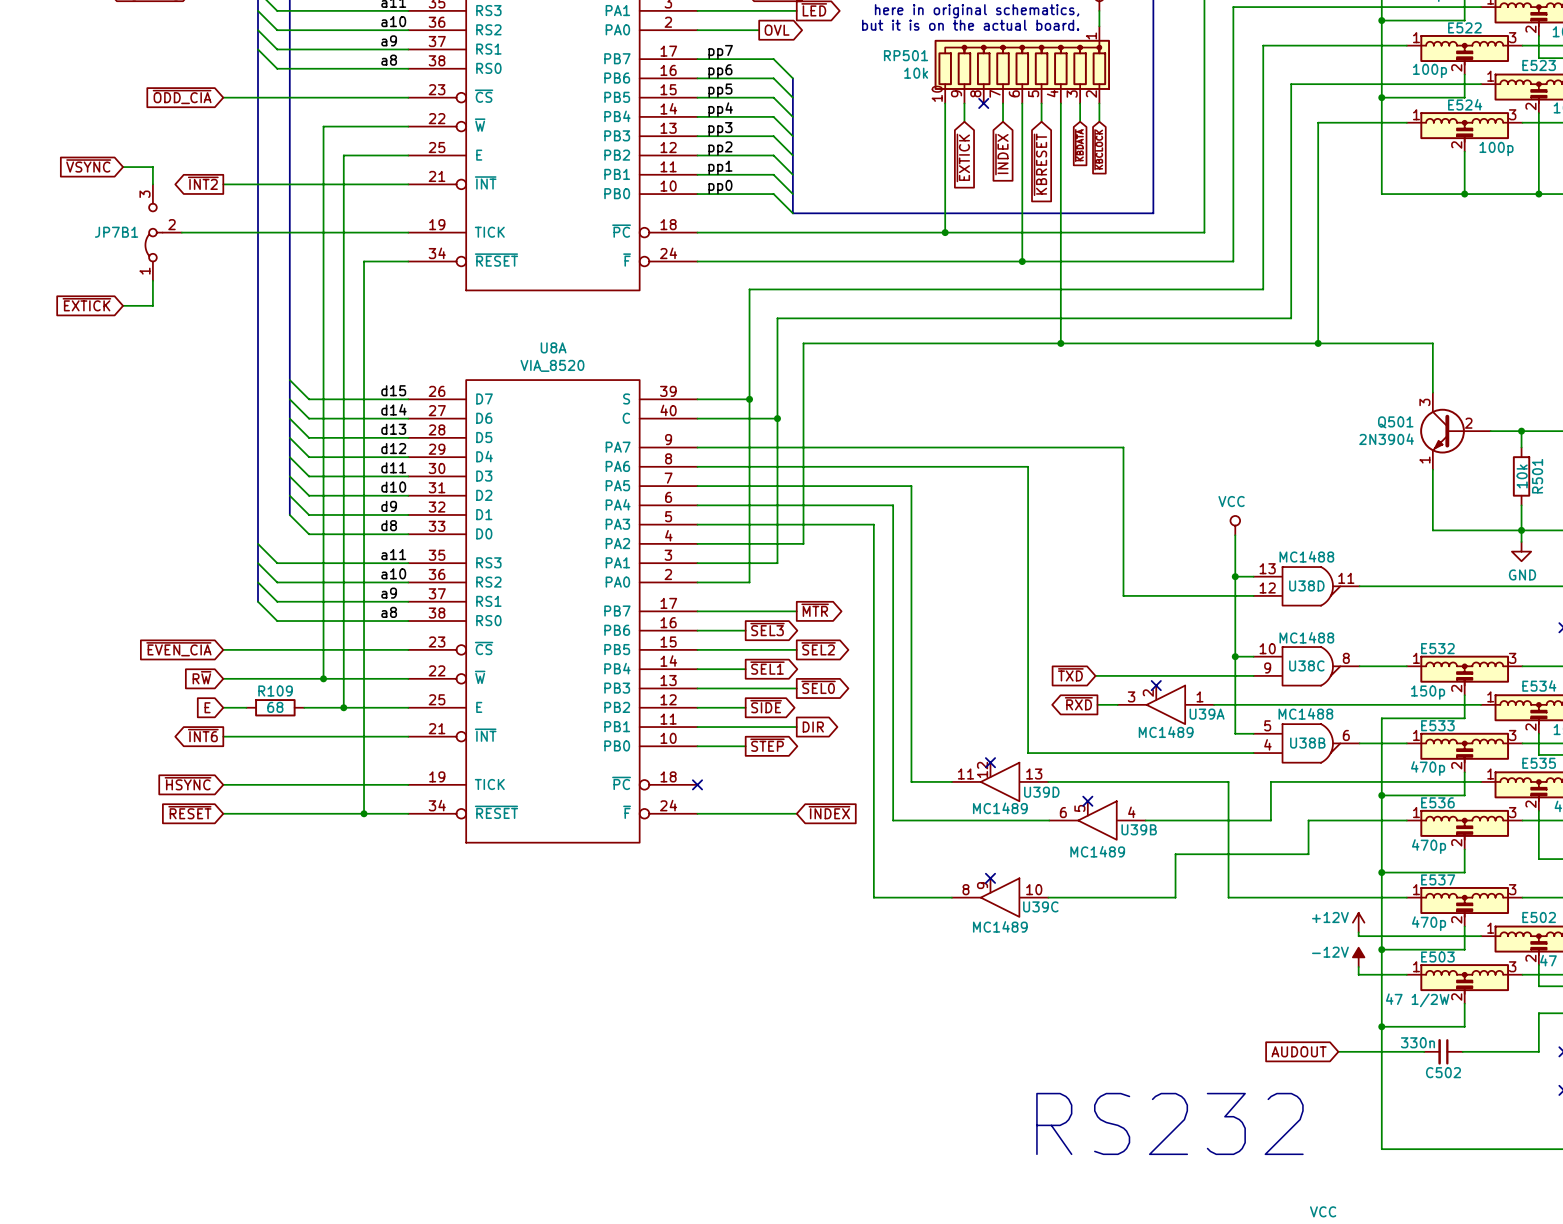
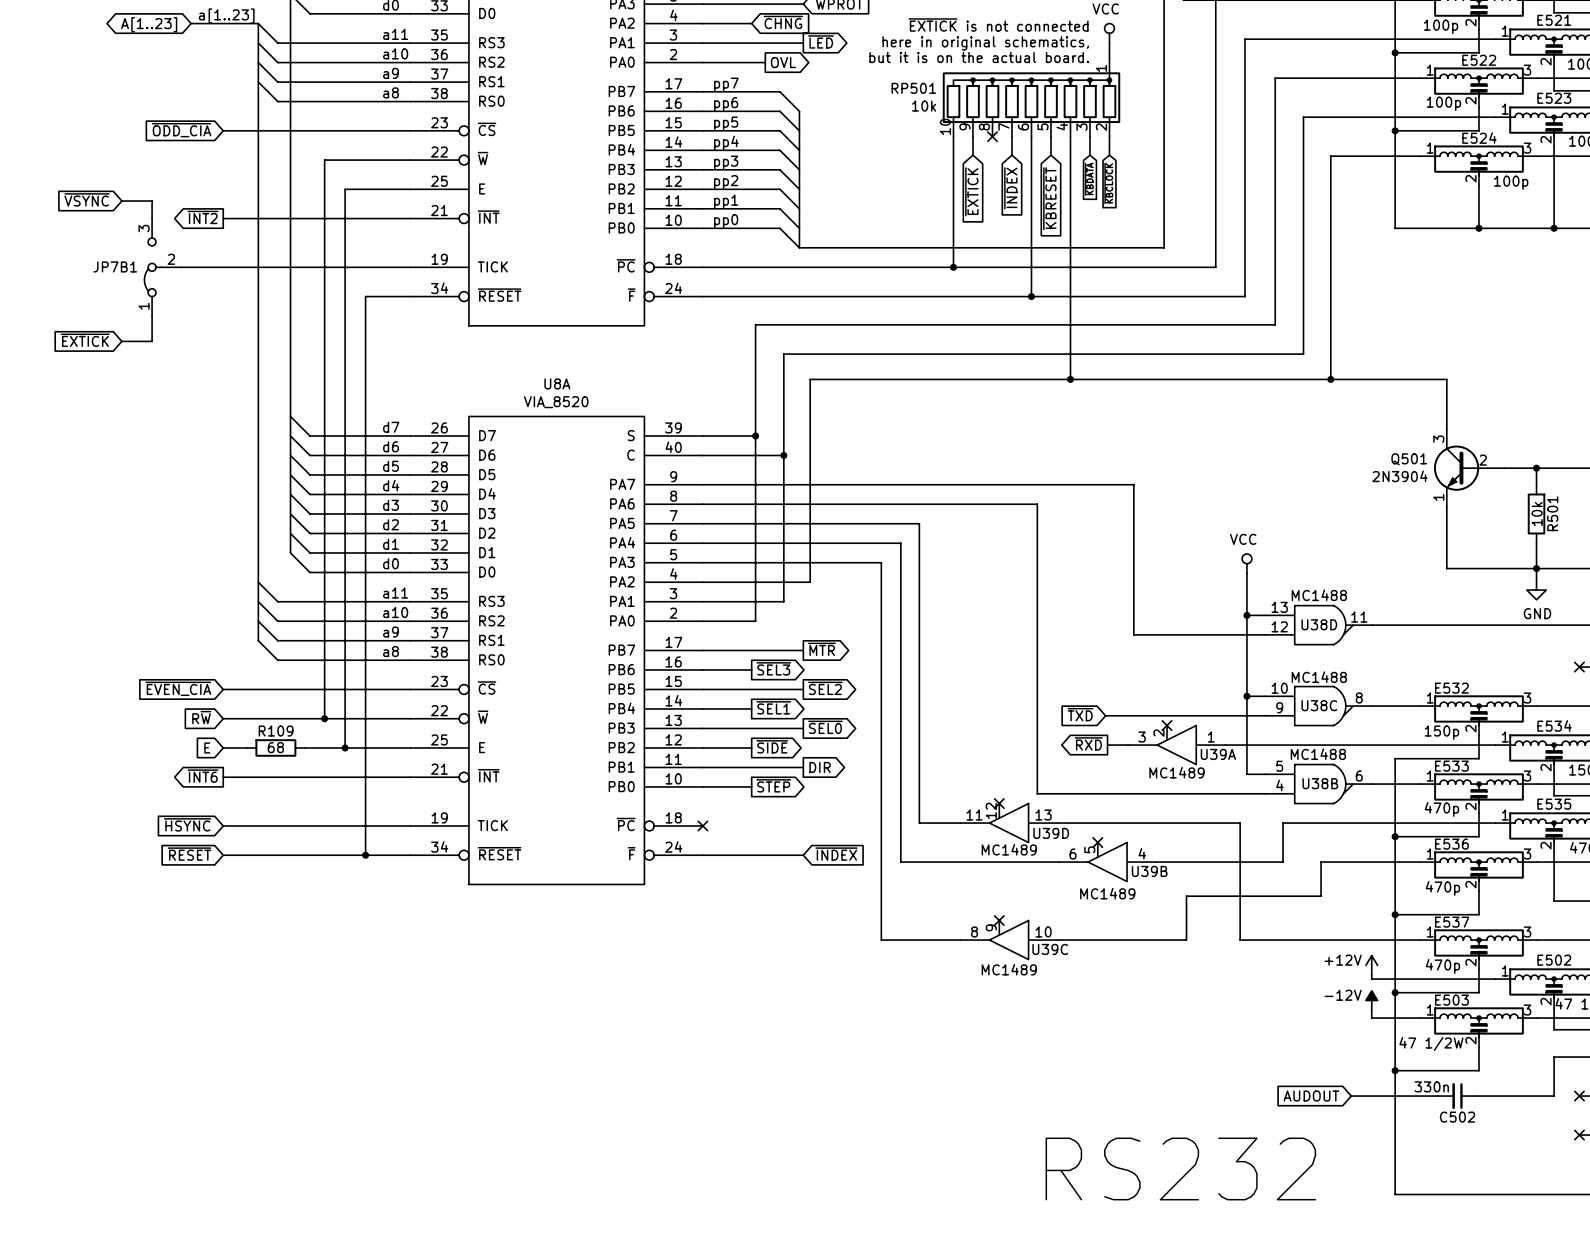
label: d15 (393, 390) -> d7 (391, 427)
label: d14 (393, 409) -> d6 (391, 446)
label: d13 (393, 429) -> d5 (391, 466)
label: d12 (393, 448) -> d4 (391, 485)
label: d11 (393, 467) -> d3 (391, 505)
label: d10 (393, 487) -> d2 (391, 524)
label: d9 (389, 506) -> d1 (391, 544)
label: d8 (389, 525) -> d0 (391, 563)

